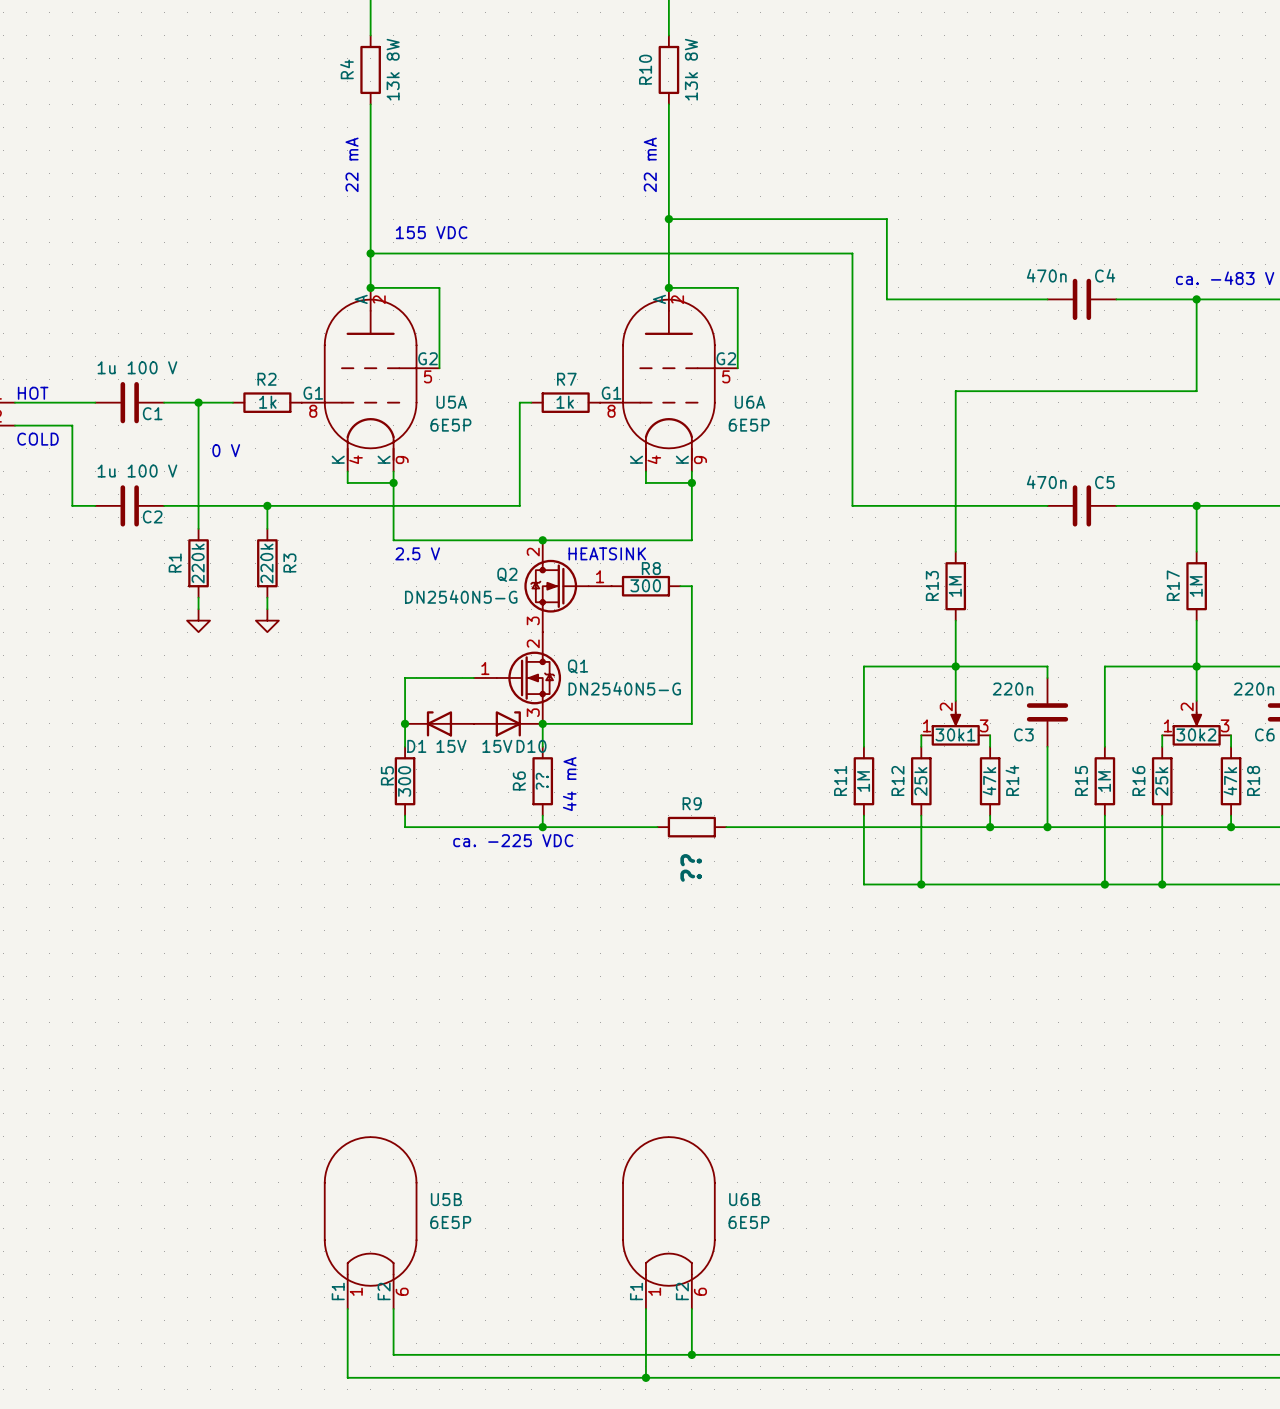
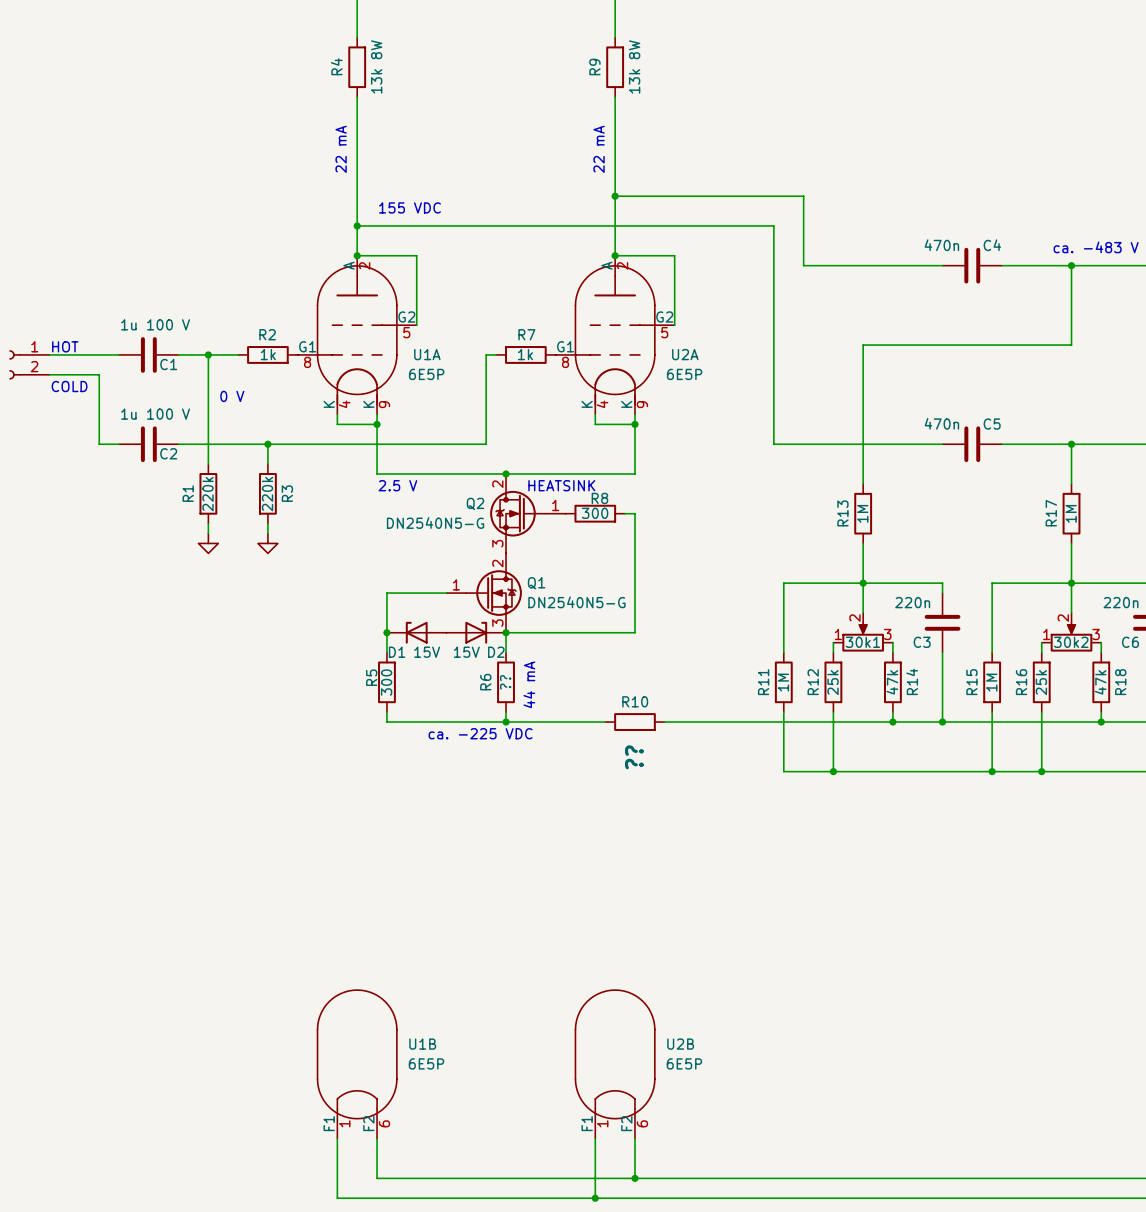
R10 name: R10 (645, 69) -> R9 (594, 67)
U5A name: U5A (451, 402) -> U1A (427, 354)
U6A name: U6A (750, 402) -> U2A (685, 354)
D10 name: D10 (531, 746) -> D2 (496, 652)
R9 name: R9 (692, 803) -> R10 (635, 701)
U5B name: U5B (446, 1199) -> U1B (422, 1044)
U6B name: U6B (744, 1199) -> U2B (680, 1044)

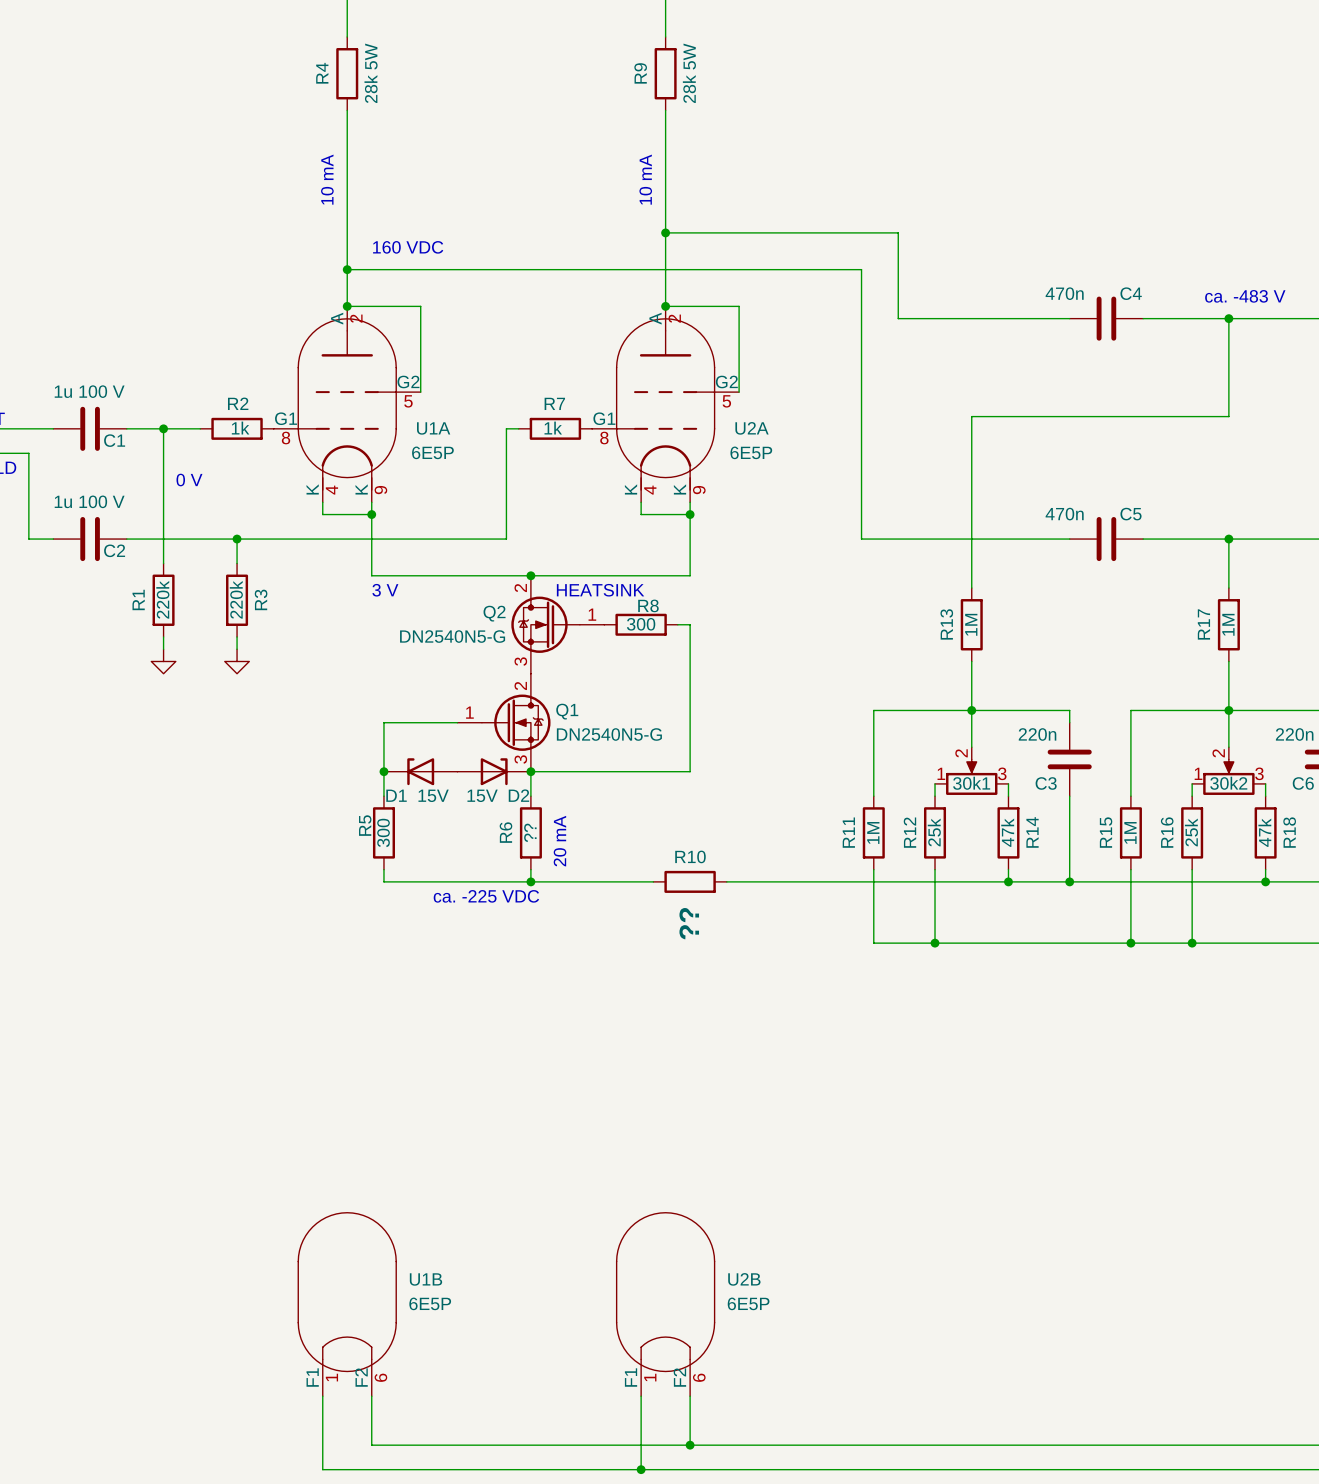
R4 value: 13k 8W (376, 67) -> 28k 5W (371, 73)
R9 value: 13k 8W (634, 67) -> 28k 5W (689, 73)
text: 22 mA (341, 149) -> 10 mA (327, 179)
text: 22 mA (599, 149) -> 10 mA (645, 179)
text: 155 VDC (409, 207) -> 160 VDC (408, 247)
text: 2.5 V (397, 485) -> 3 V (385, 590)
text: 44 mA (529, 684) -> 20 mA (560, 841)

